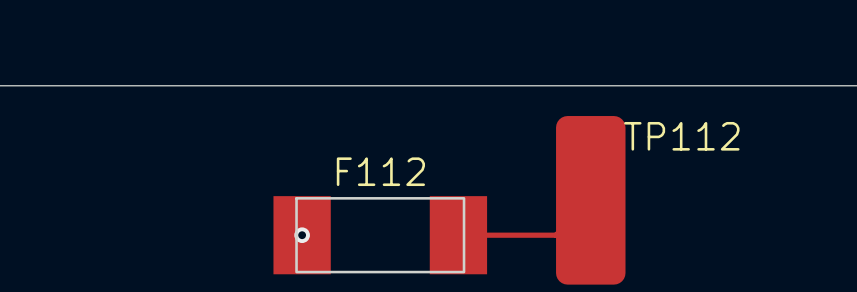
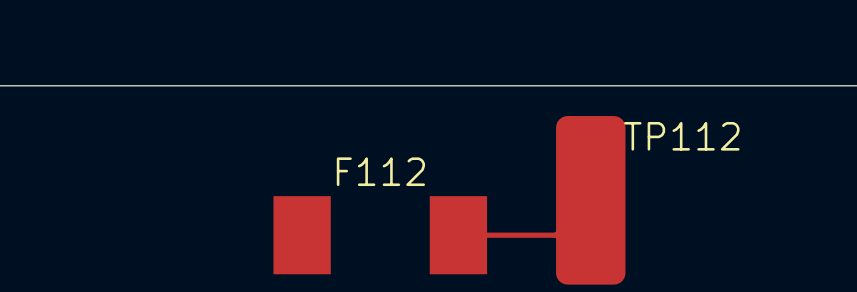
F112 footprint: [273, 196, 488, 275] -> [273, 196, 488, 275]
via: (302, 235) -> none

